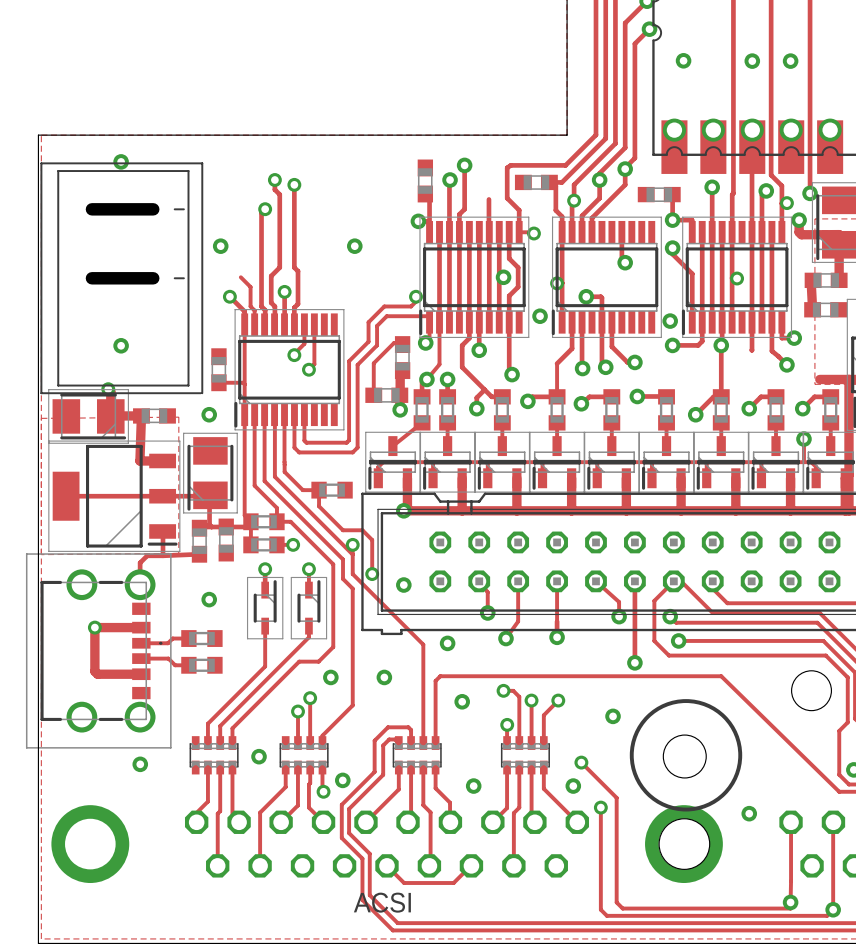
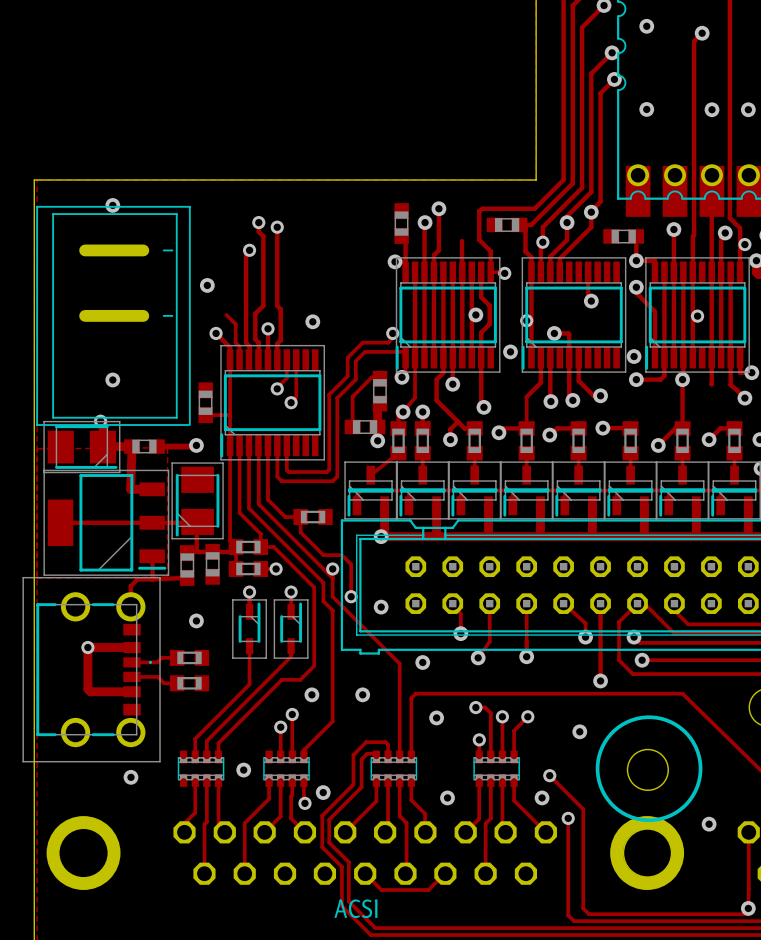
via position: (354, 246) -> (312, 321)
track: none -> (196, 445) (156, 446)

